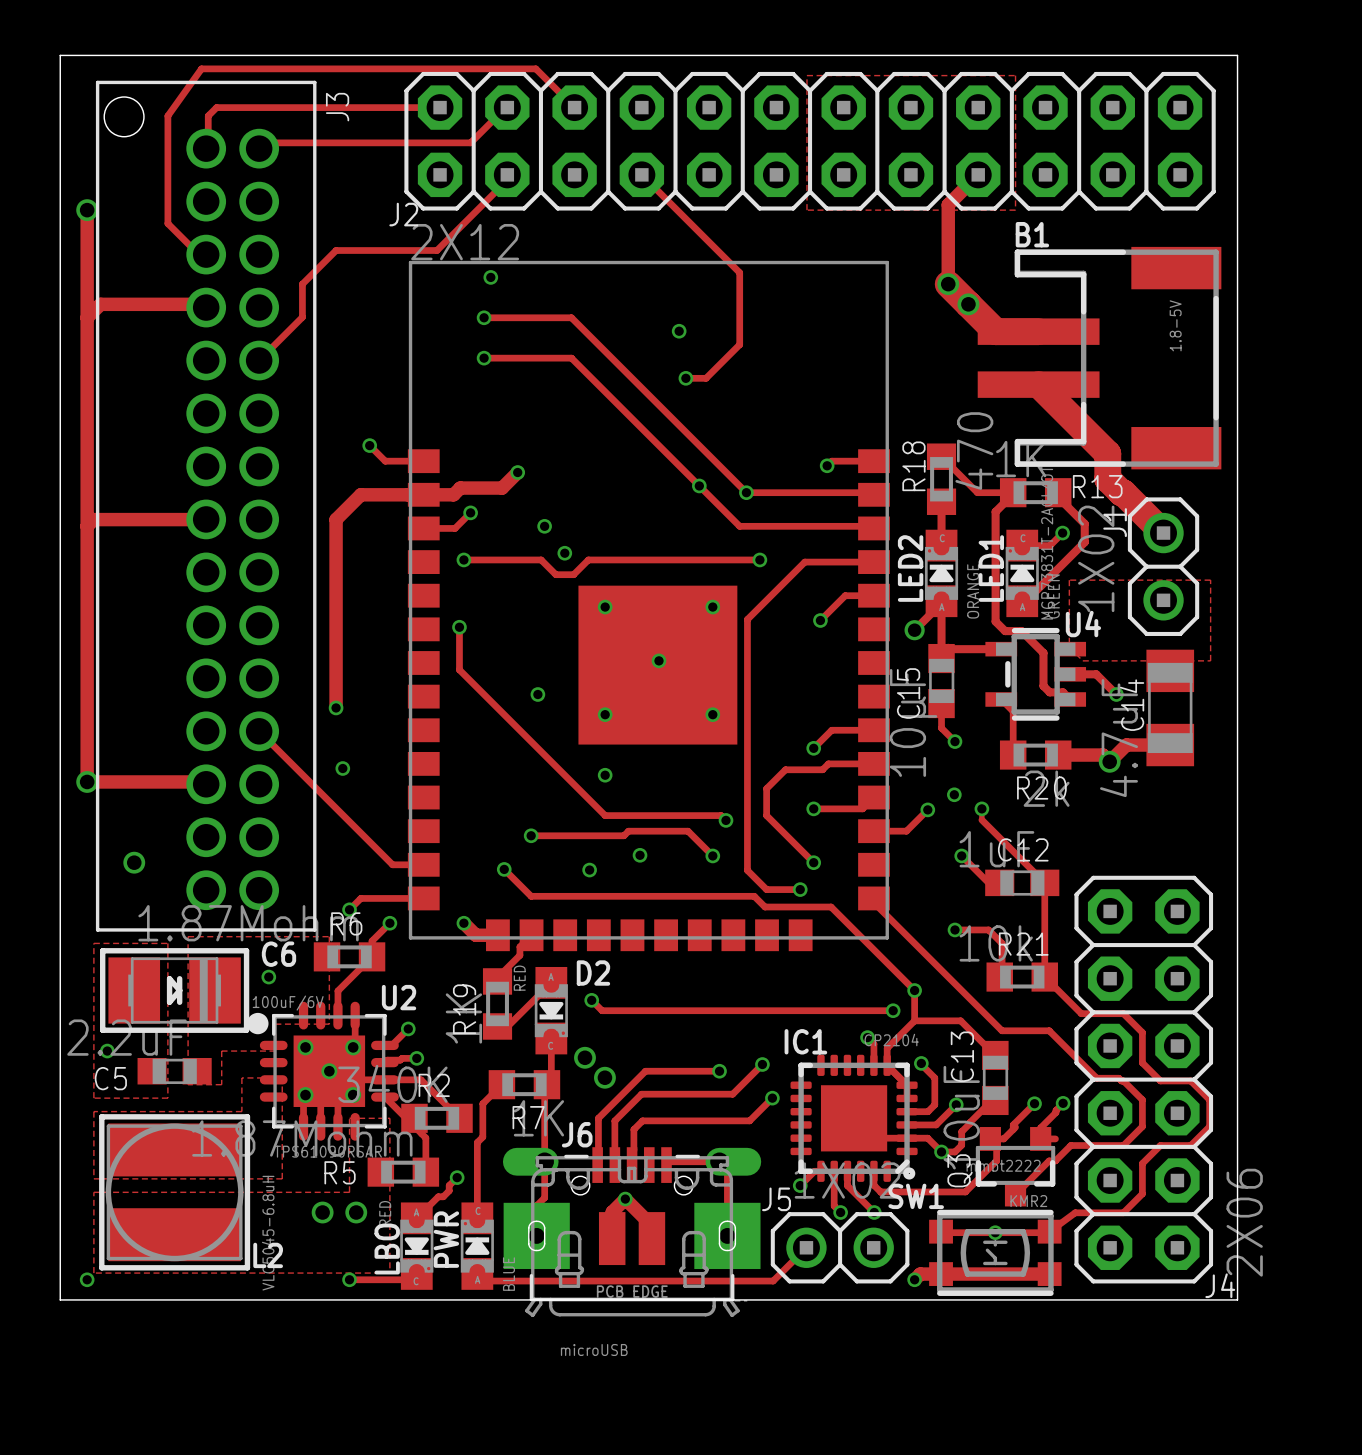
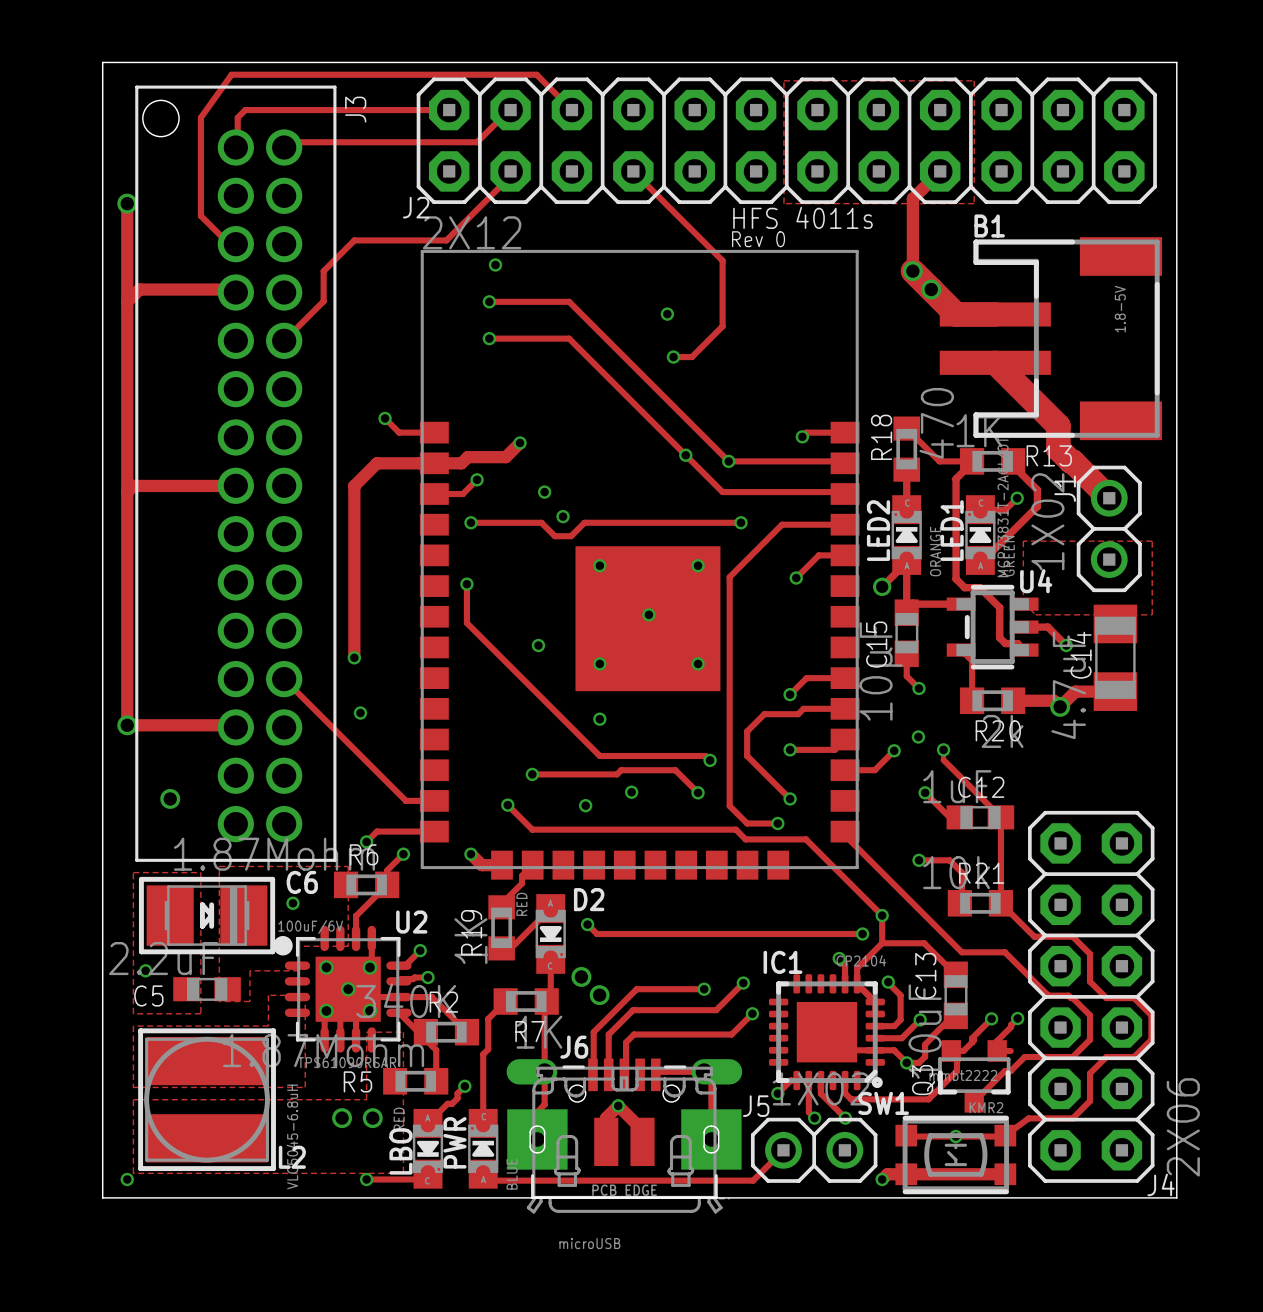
text: none -> HFS 4011s (803, 217)
text: none -> Rev 0 (758, 239)

